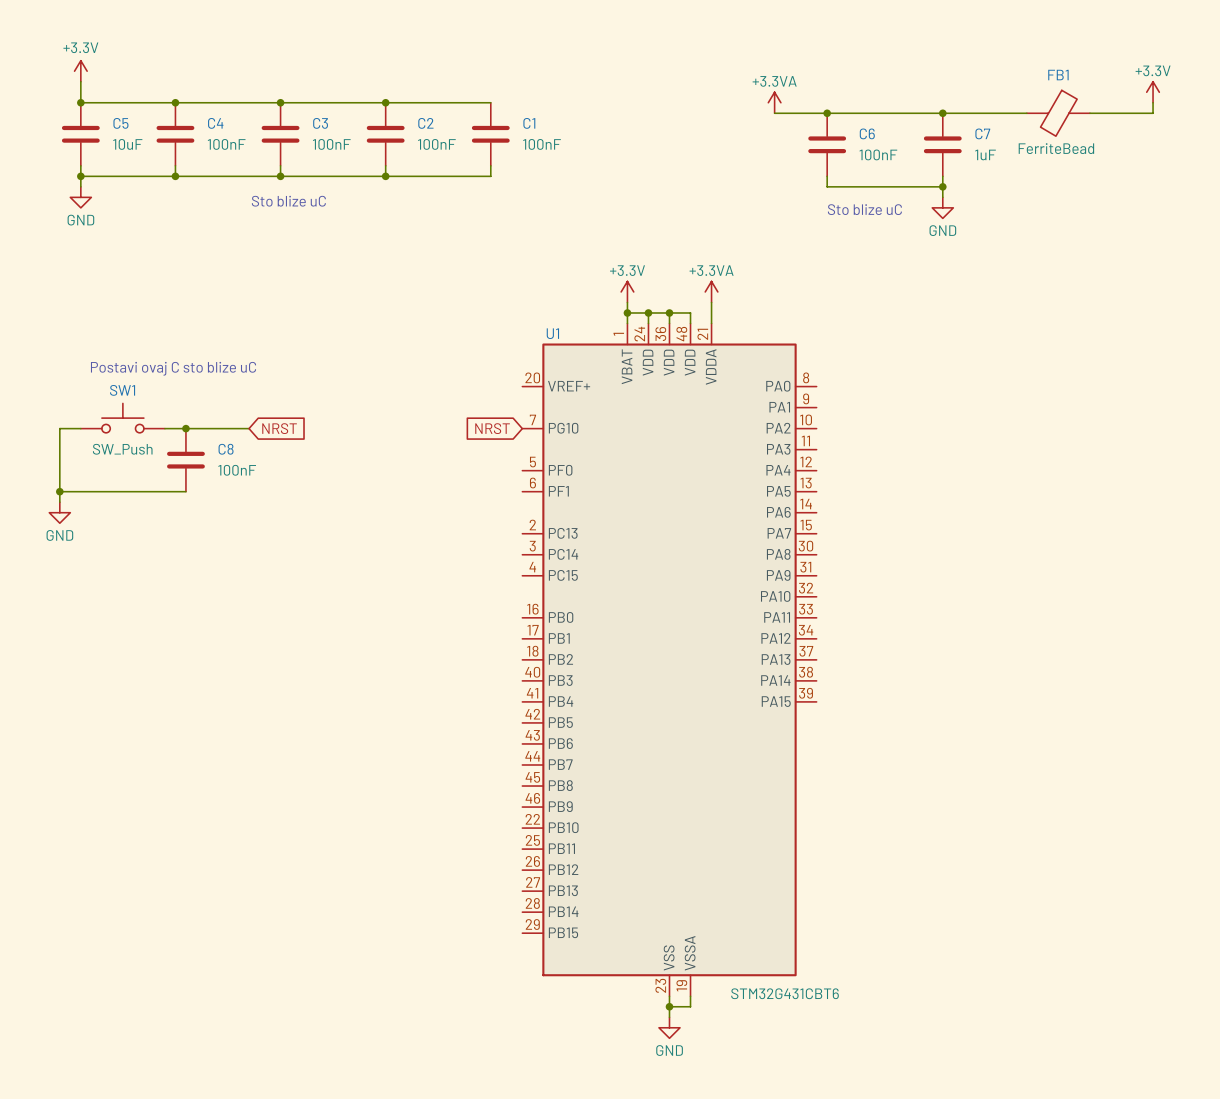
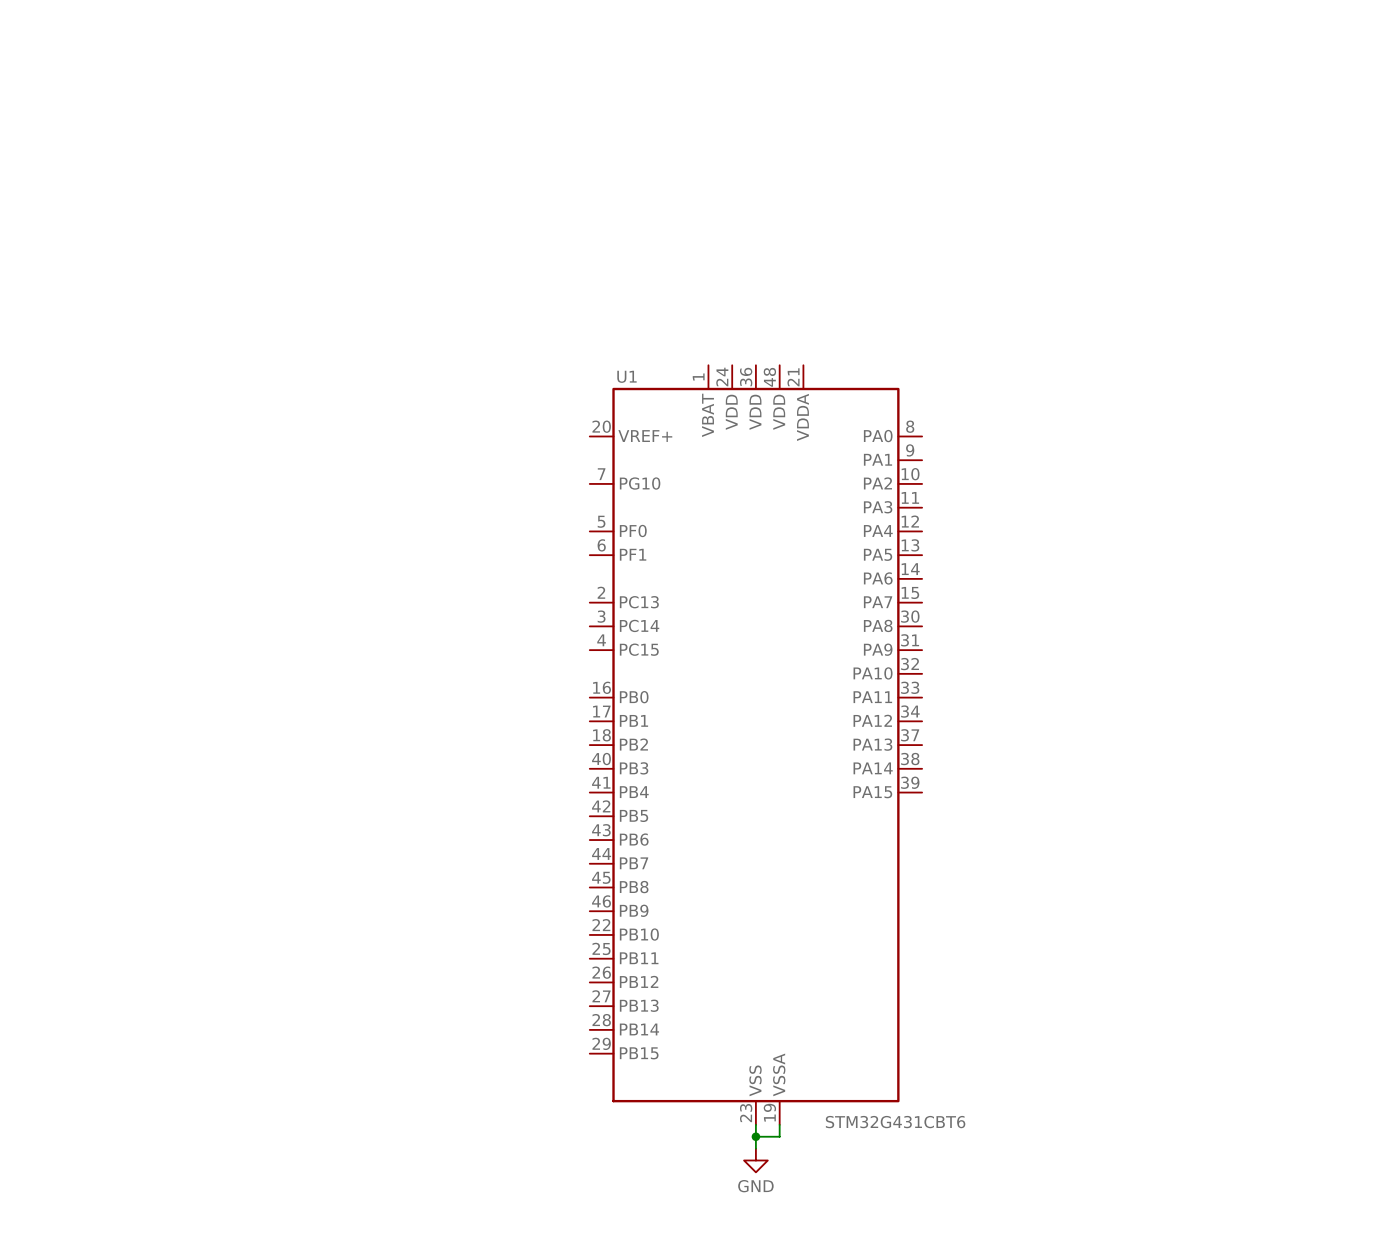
power symbol: +3.3V (80, 71) -> none
wire: (80, 81) (80, 102) (490, 102) -> none
power symbol: +3.3V (1153, 92) -> none
junction: (80, 102) -> none
junction: (175, 102) -> none
junction: (280, 102) -> none
junction: (385, 102) -> none
power symbol: +3.3VA (774, 102) -> none
wire: (1153, 102) (1153, 113) (1089, 113) -> none
wire: (774, 113) (1026, 113) -> none
junction: (827, 113) -> none
junction: (942, 113) -> none
FB1: FerriteBead (1058, 113) -> none
C5: 10uF (80, 134) -> none
C4: 100nF (175, 134) -> none
C3: 100nF (280, 134) -> none
C2: 100nF (385, 134) -> none
C1: 100nF (490, 134) -> none
C6: 100nF (827, 144) -> none
C7: 1uF (942, 144) -> none
wire: (80, 165) (80, 186) -> none
wire: (175, 165) (175, 176) -> none
wire: (280, 165) (280, 176) -> none
wire: (385, 165) (385, 176) -> none
wire: (490, 165) (490, 176) (80, 176) -> none
junction: (80, 176) -> none
junction: (175, 176) -> none
junction: (280, 176) -> none
junction: (385, 176) -> none
wire: (827, 176) (827, 186) (942, 186) -> none
wire: (942, 176) (942, 197) -> none
junction: (942, 186) -> none
power symbol: GND (80, 197) -> none
text: Sto blize uC (288, 201) -> none
power symbol: GND (942, 207) -> none
text: Sto blize uC (864, 209) -> none
power symbol: +3.3V (627, 291) -> none
power symbol: +3.3VA (711, 291) -> none
wire: (627, 302) (627, 323) -> none
wire: (711, 302) (711, 323) -> none
wire: (627, 312) (690, 312) (690, 323) -> none
junction: (627, 312) -> none
wire: (648, 312) (648, 323) -> none
junction: (648, 312) -> none
wire: (669, 312) (669, 323) -> none
junction: (669, 312) -> none
text: Postavi ovaj C sto blize uC (173, 368) -> none
SW1: SW_Push (122, 418) -> none
wire: (80, 428) (59, 428) (59, 502) -> none
wire: (164, 428) (249, 428) -> none
junction: (185, 428) -> none
global label: NRST (279, 428) -> none
global label: NRST (492, 428) -> none
C8: 100nF (185, 460) -> none
wire: (59, 491) (185, 491) -> none
junction: (59, 491) -> none
power symbol: GND (59, 512) -> none

